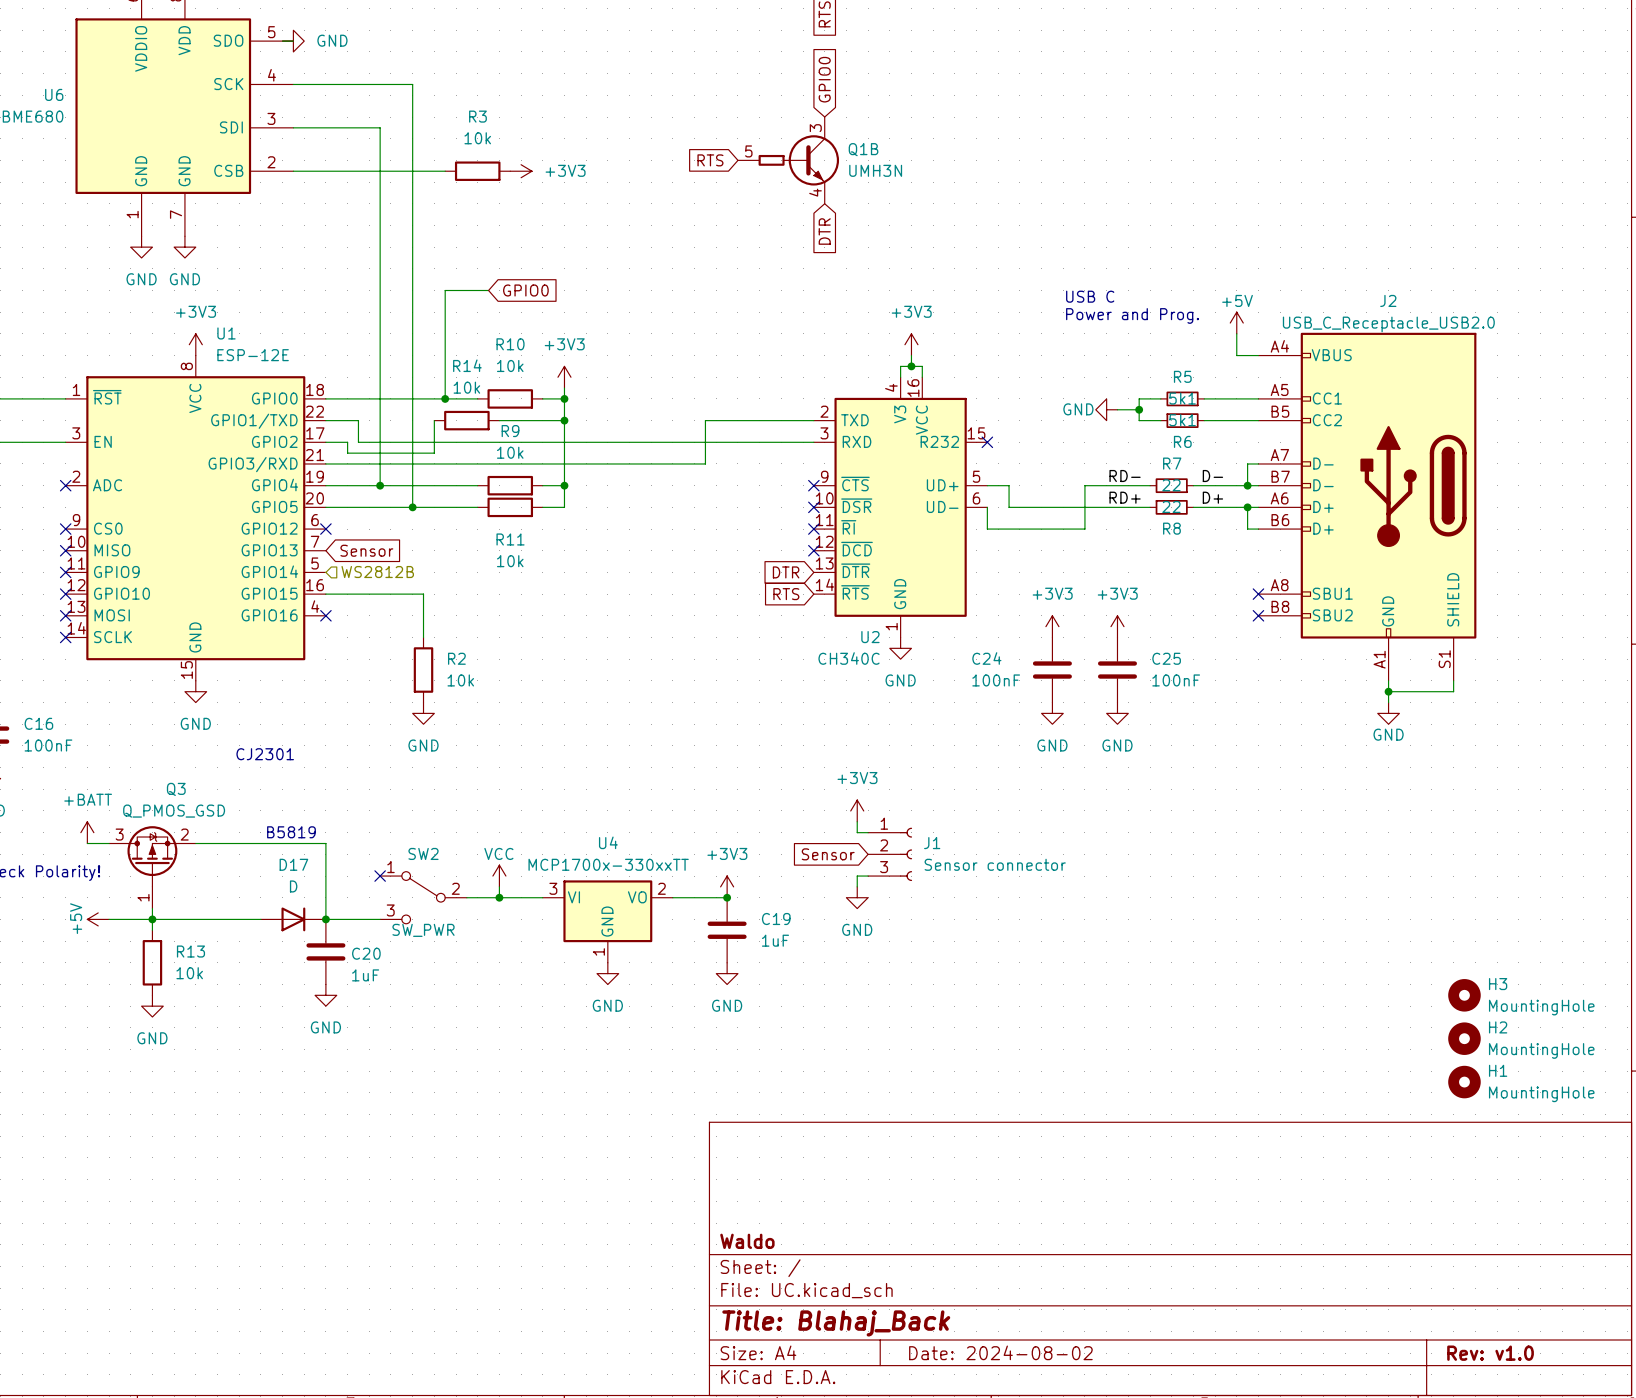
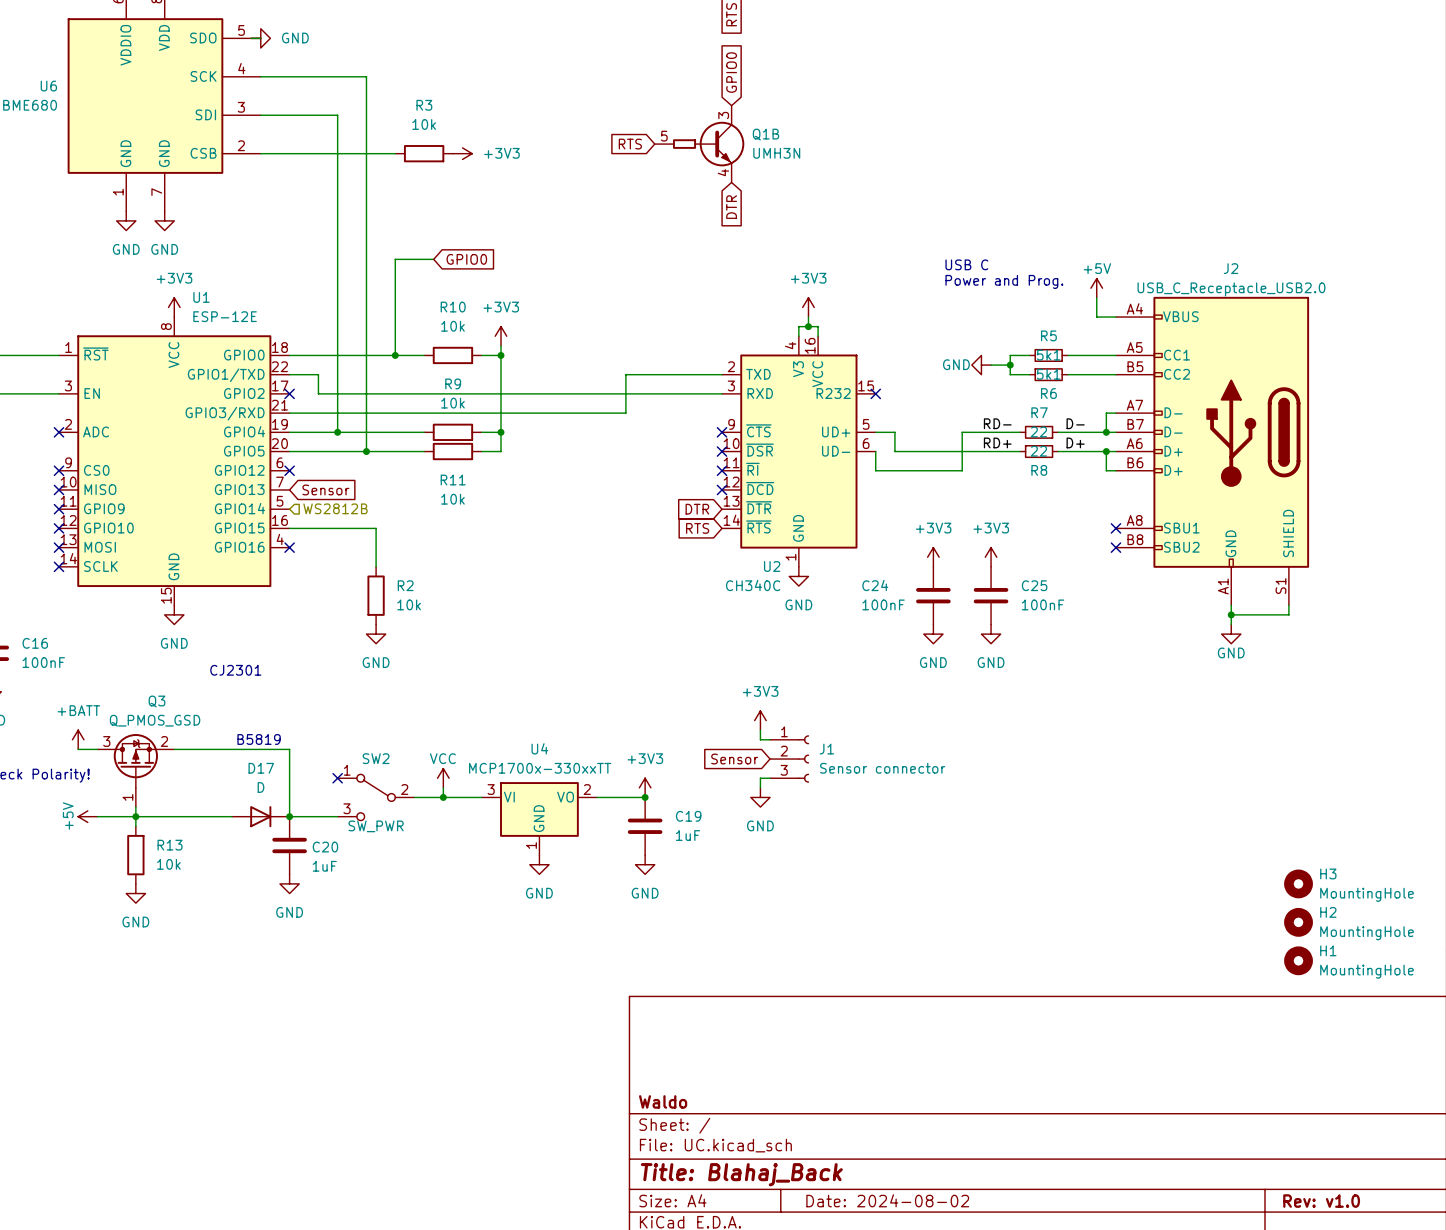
wire: (434, 420) (434, 453) (347, 453) (347, 442) (325, 442) -> none
R14: 10k (466, 420) -> none
wire: (499, 420) (564, 420) -> none
junction: (564, 420) -> none
no-connect mark: none -> (289, 393)

